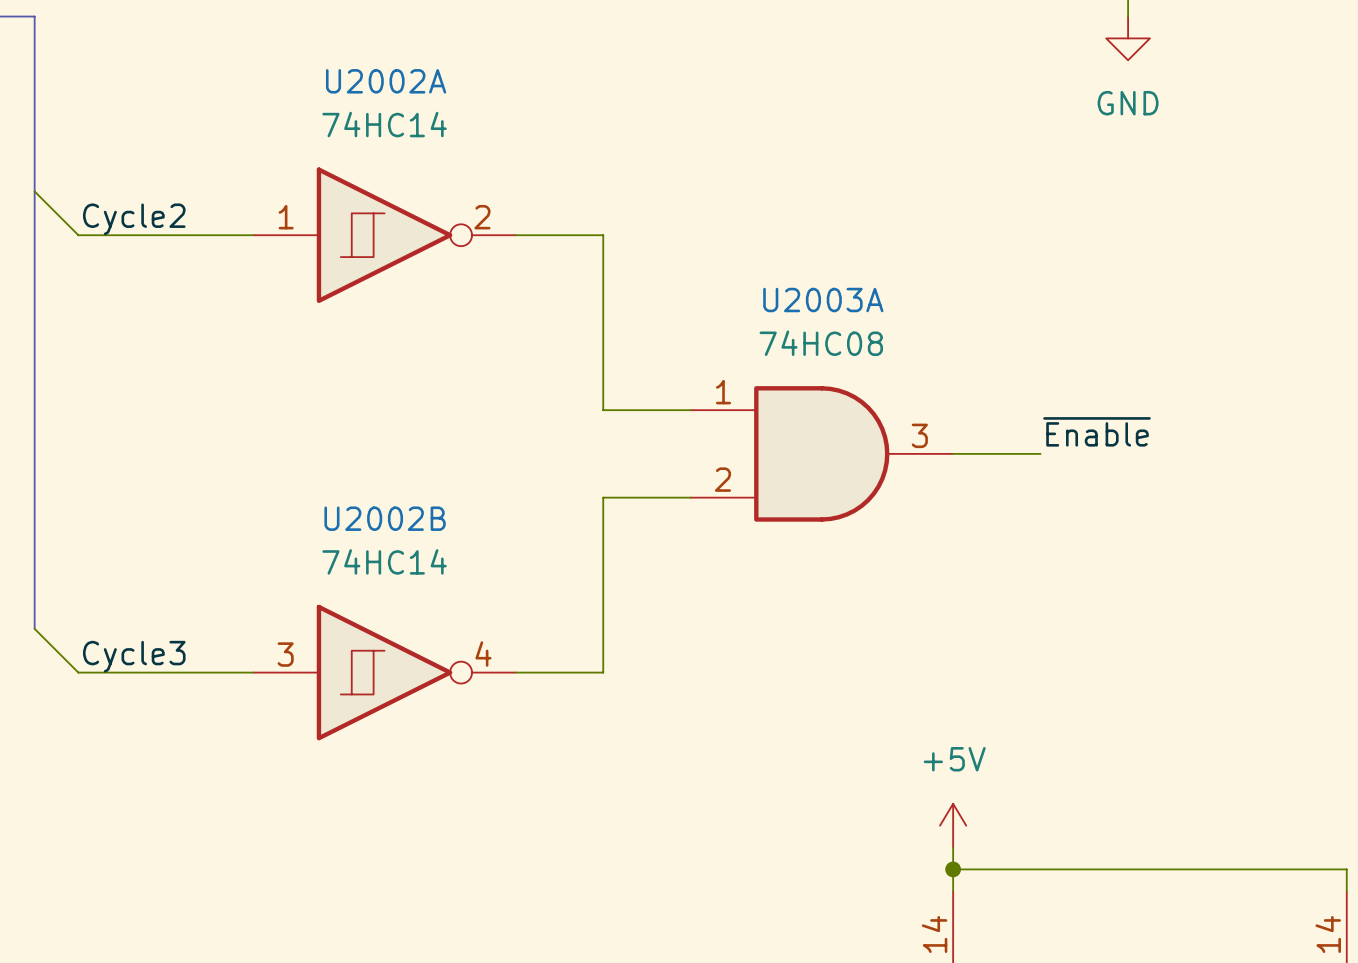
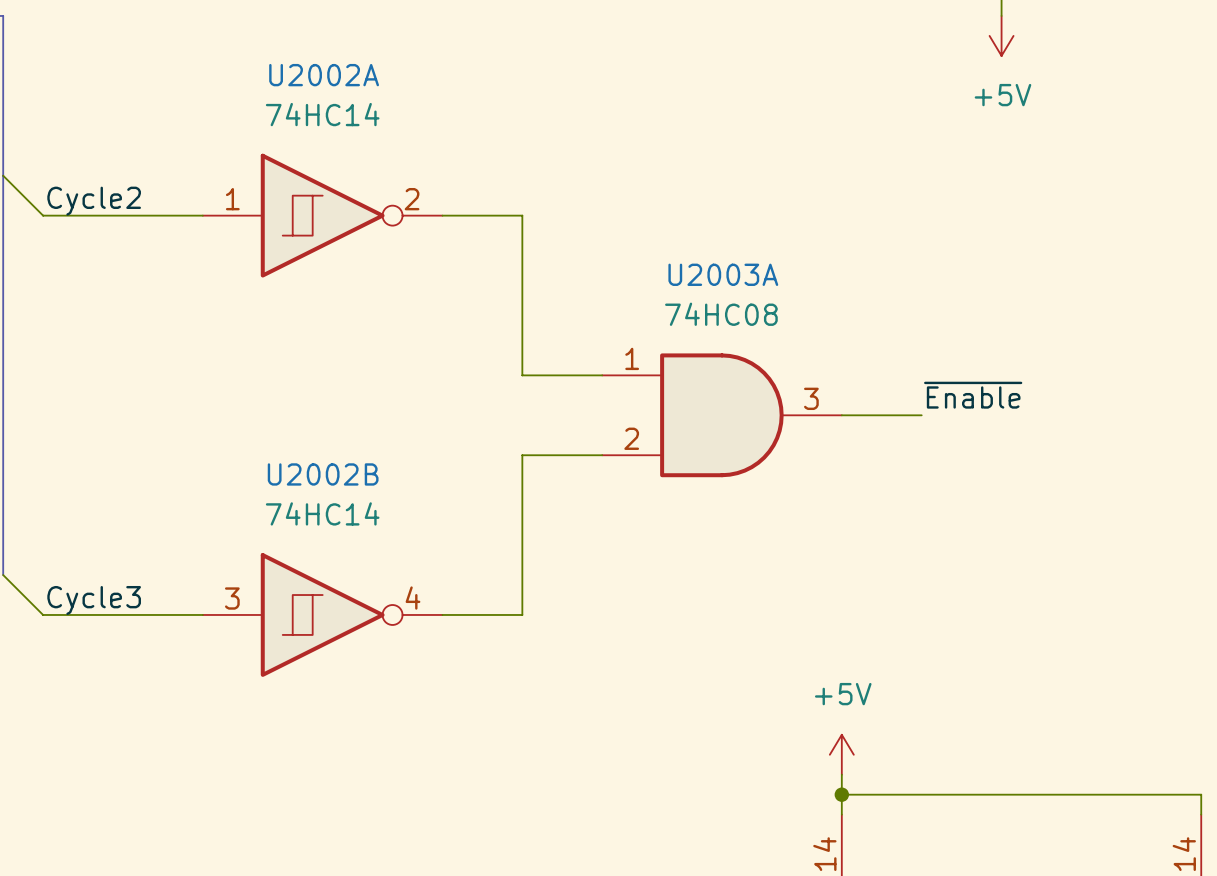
power symbol: GND (1128, 38) -> +5V (1001, 35)

